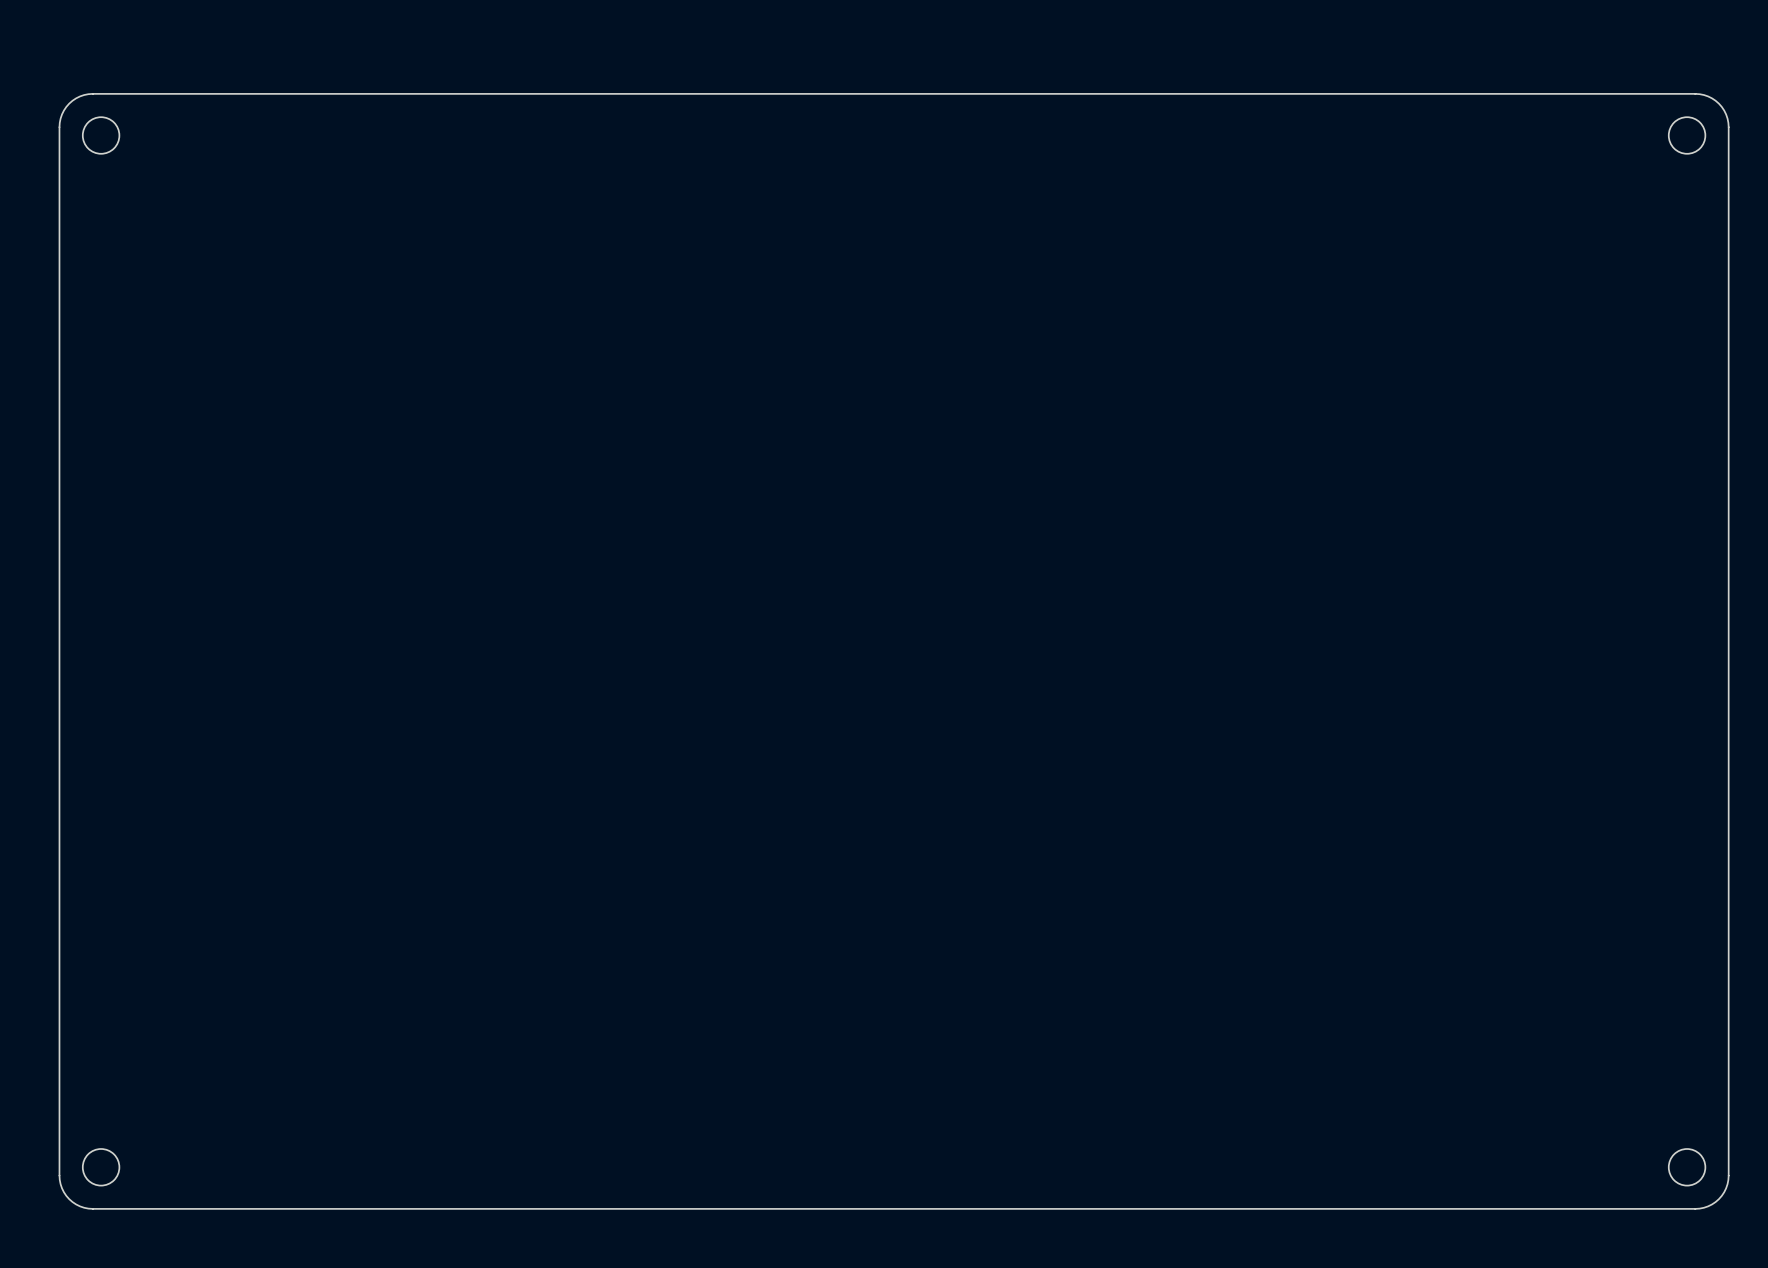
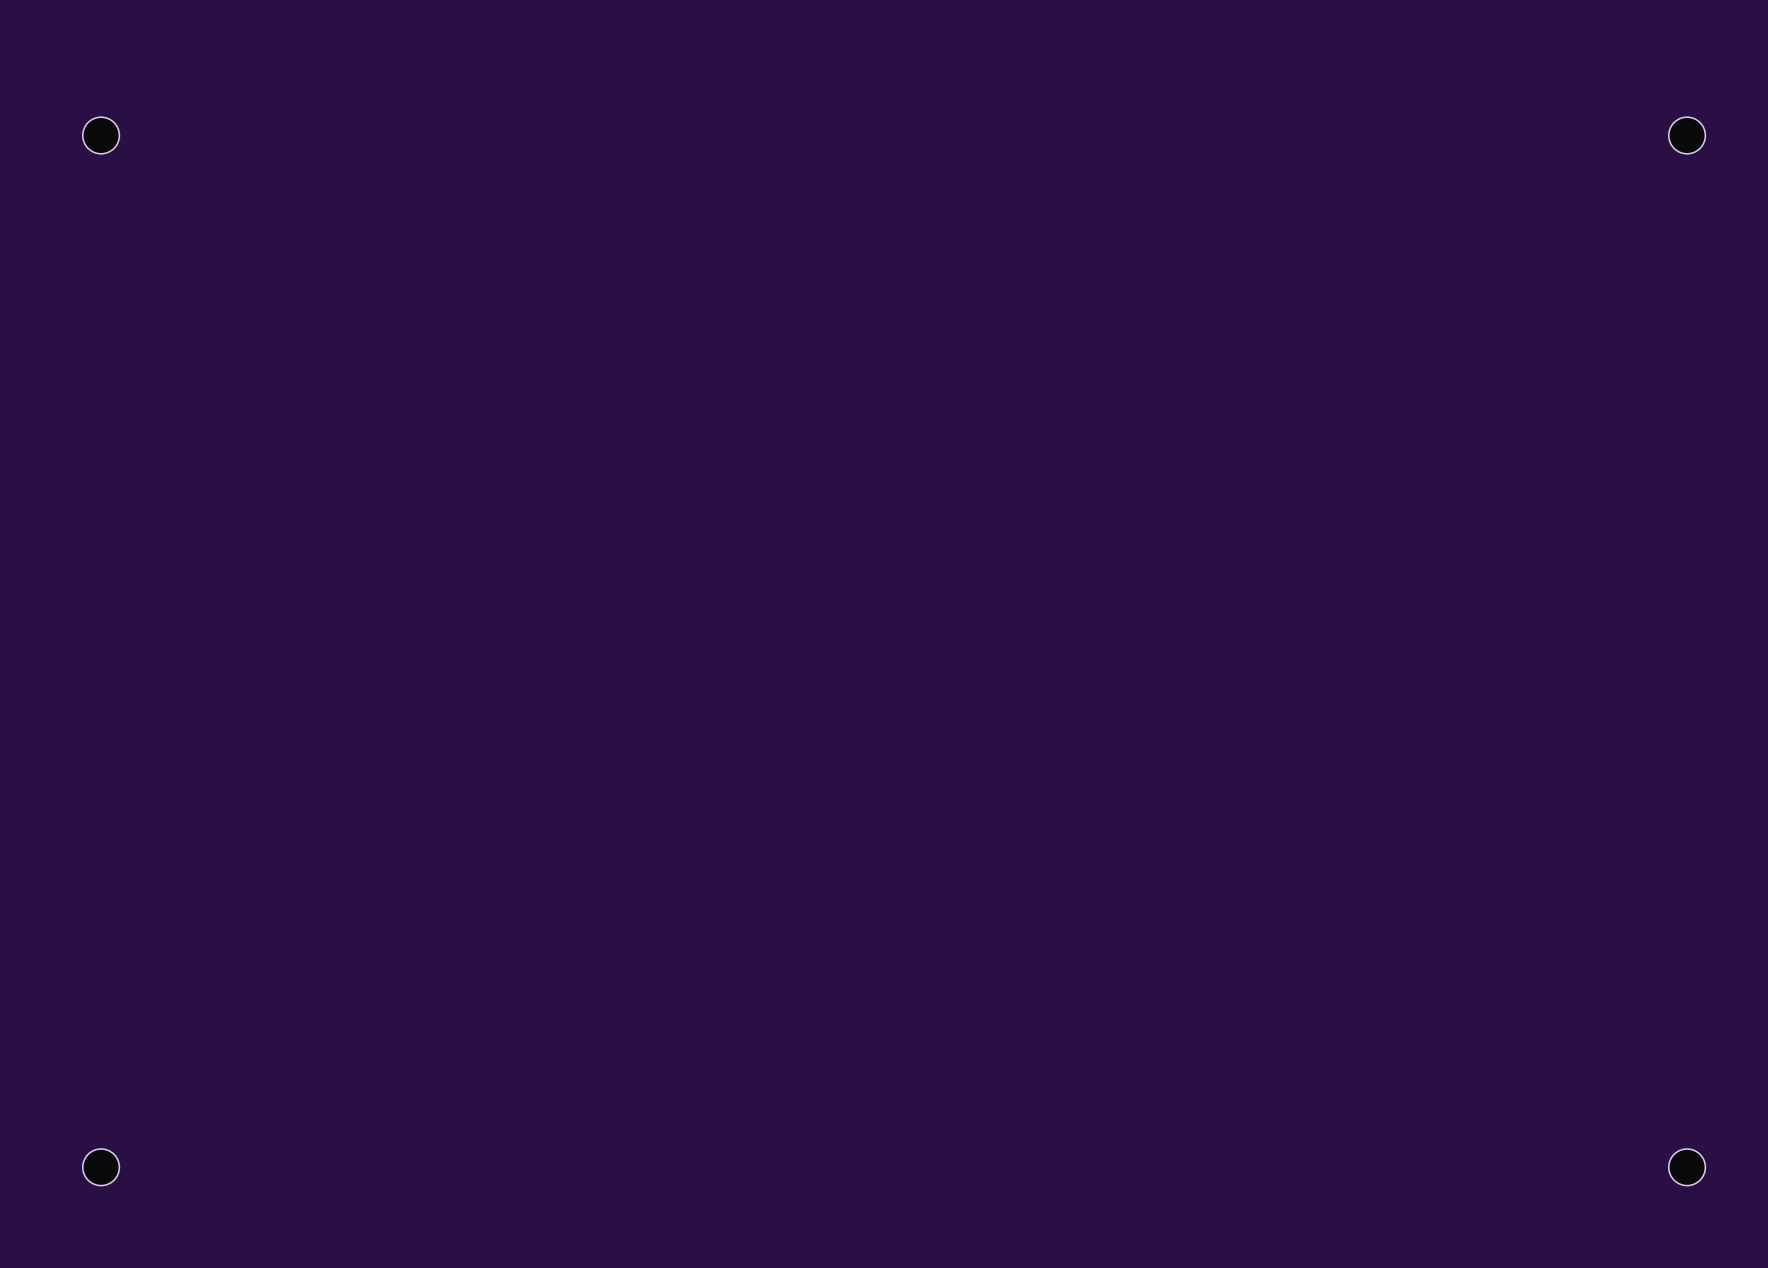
board edge: (1695, 93) (92, 93) (84, 95) (72, 100) (62, 114) (59, 127) (59, 1175) (62, 1188) (66, 1195) (80, 1206) (92, 1208) (1695, 1208) (1708, 1206) (1715, 1202) (1724, 1192) (1728, 1175) (1728, 127) (1726, 114) (1718, 103) (1708, 96) (1695, 93) -> none

